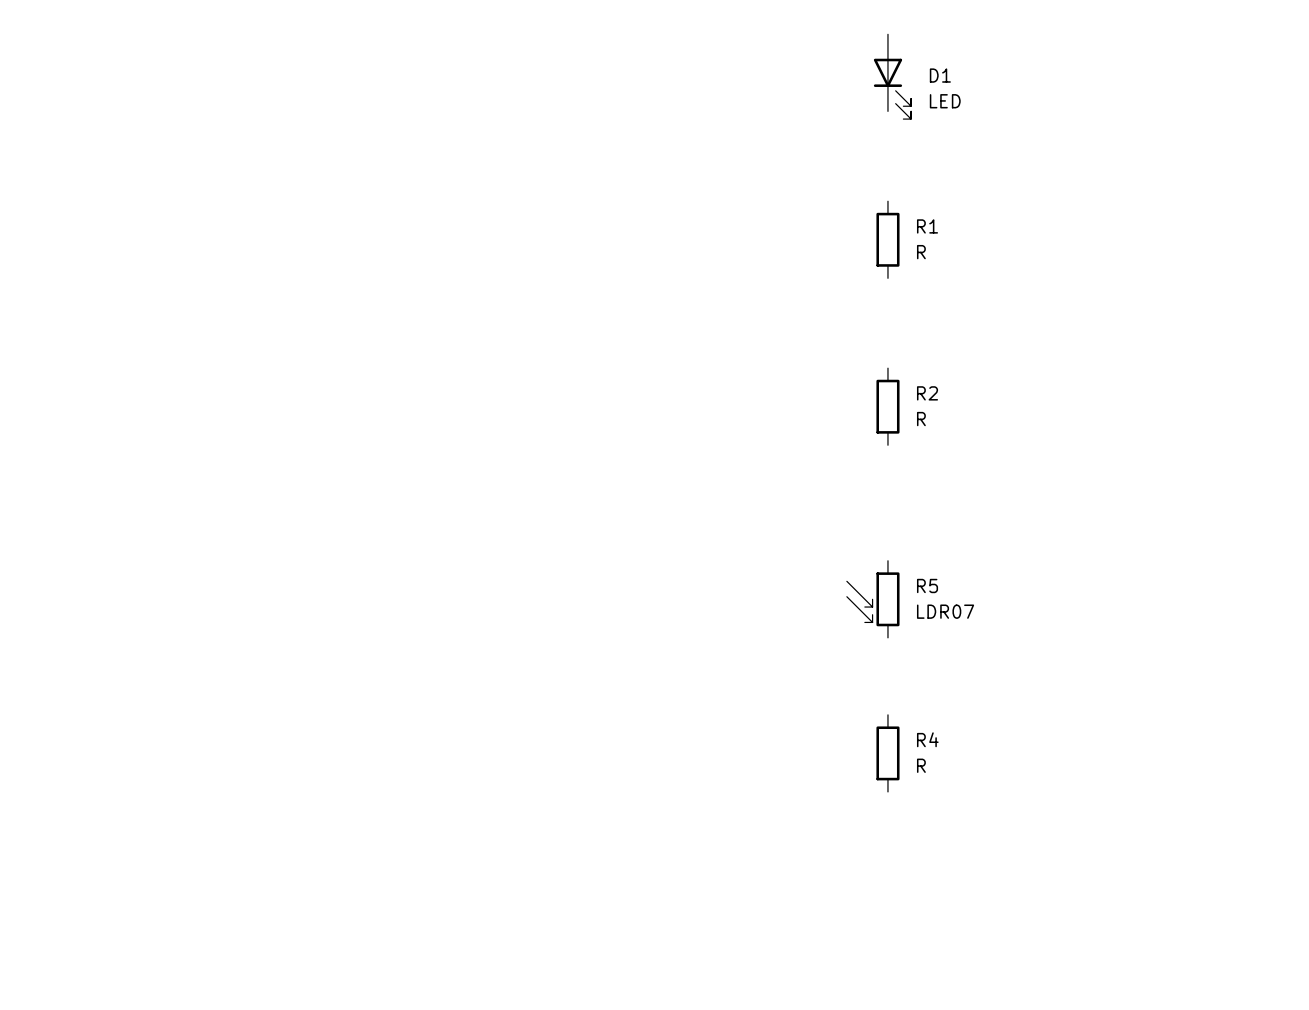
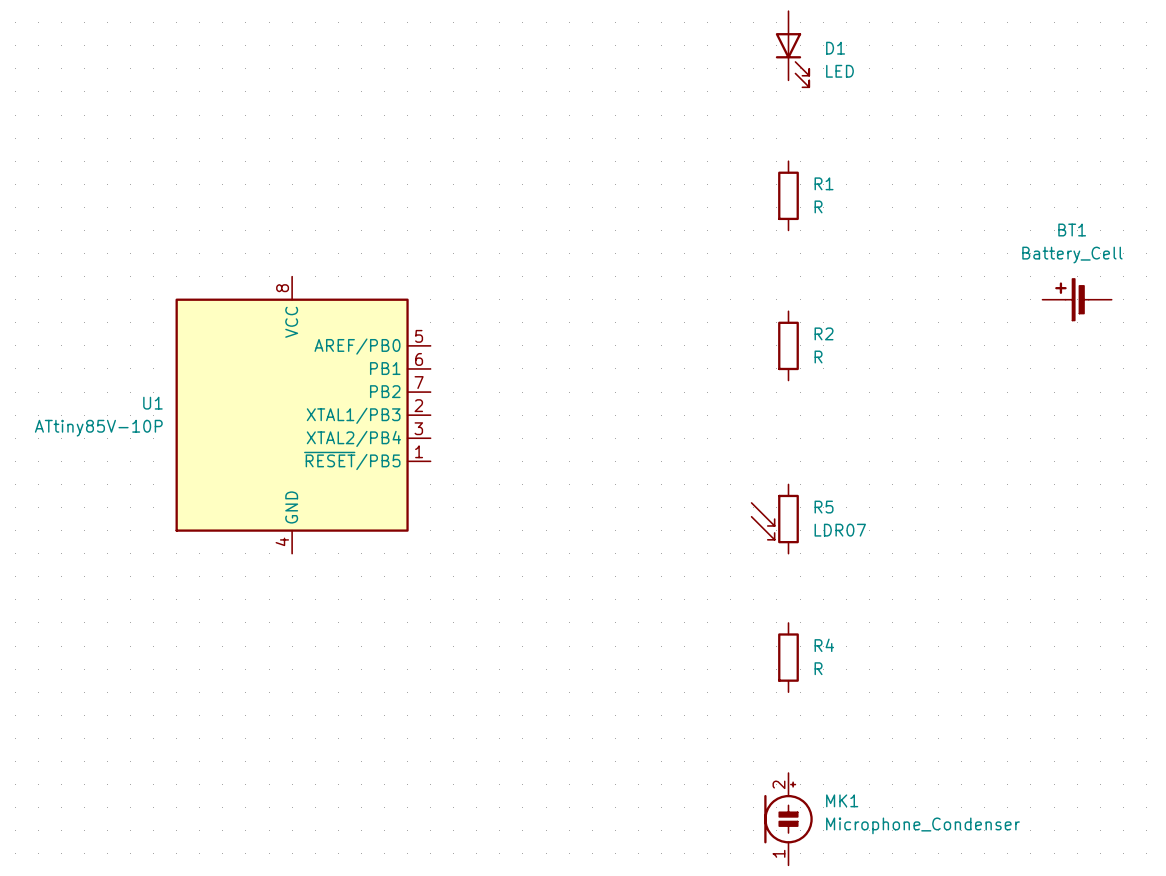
BT1: none -> Battery_Cell (1077, 299)
U1: none -> ATtiny85V-10P (303, 415)
MK1: none -> Microphone_Condenser (788, 819)

